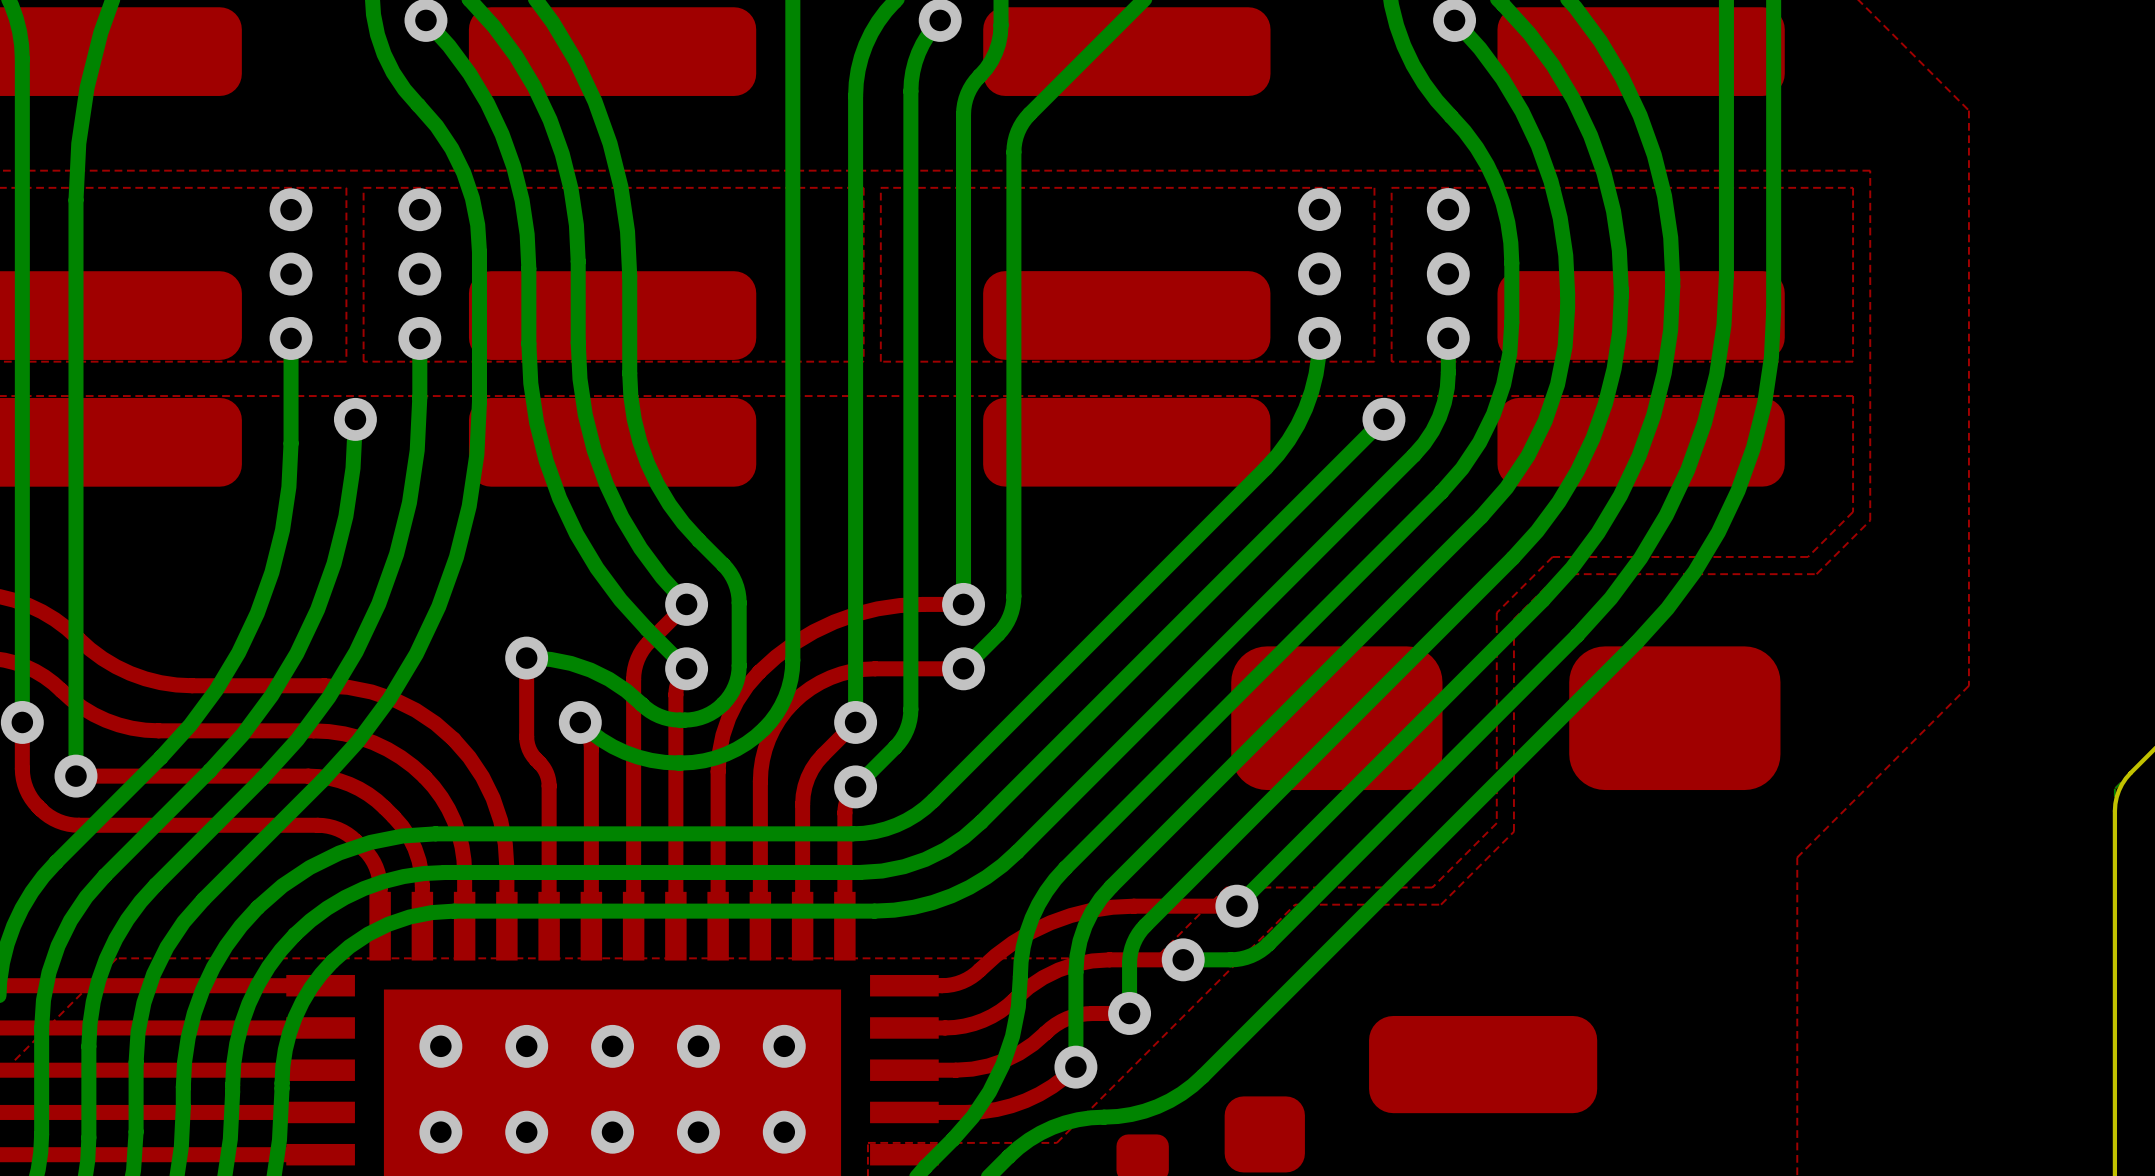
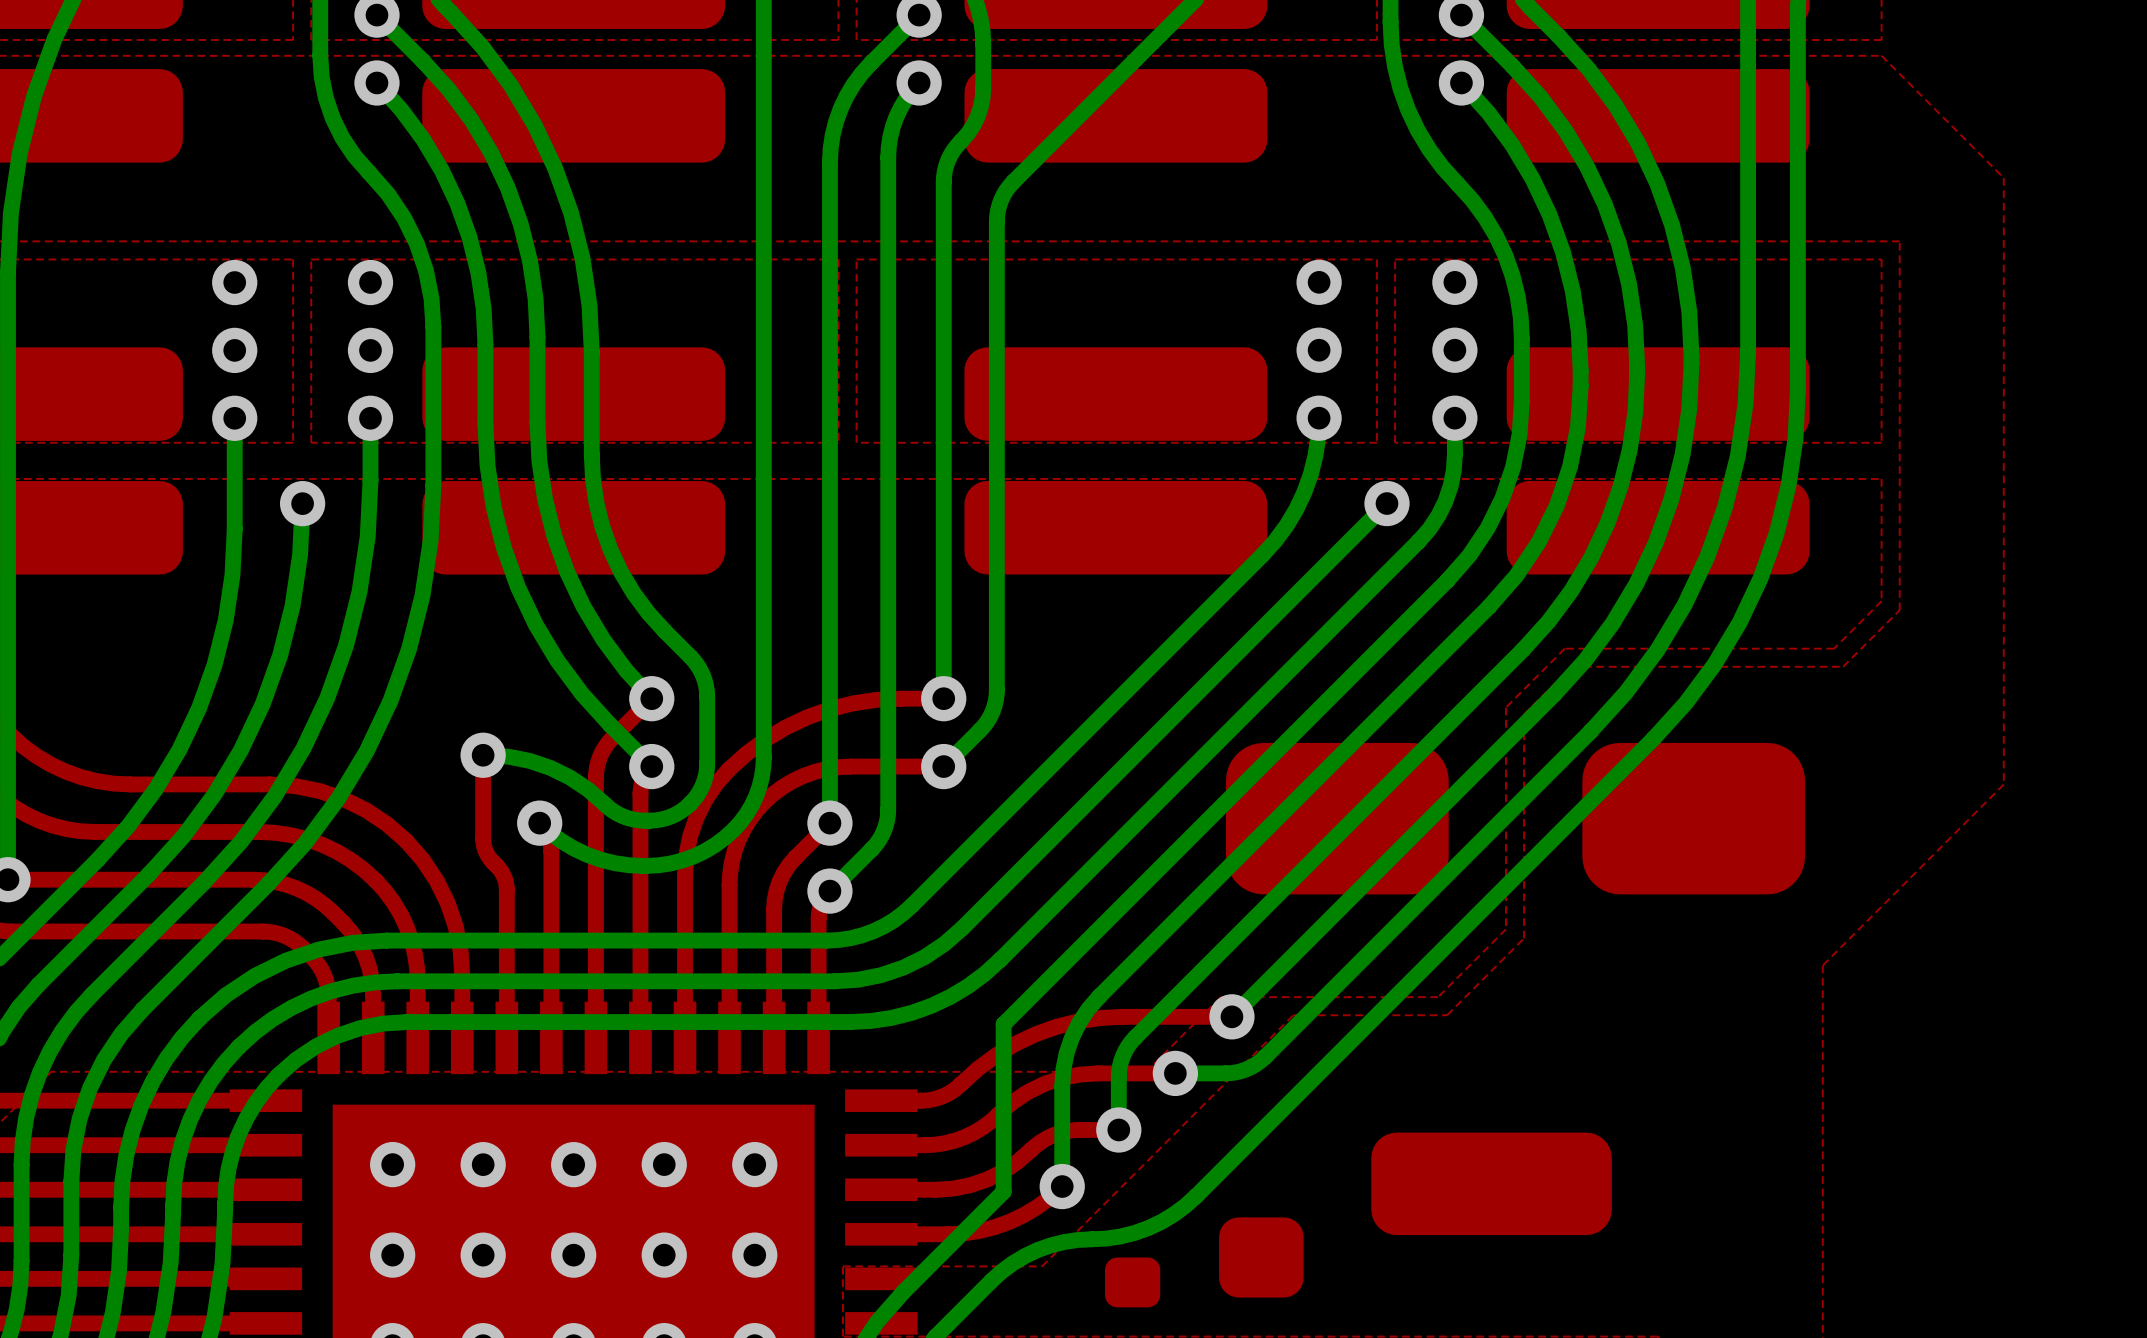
bottom track: (1065, 868) (1038, 904) (1026, 932) (1021, 961) (1018, 1006) (1012, 1036) (1002, 1064) (989, 1091) (972, 1116) (953, 1139) -> (1051, 976) (1003, 1024) (1003, 1191) (932, 1262)

